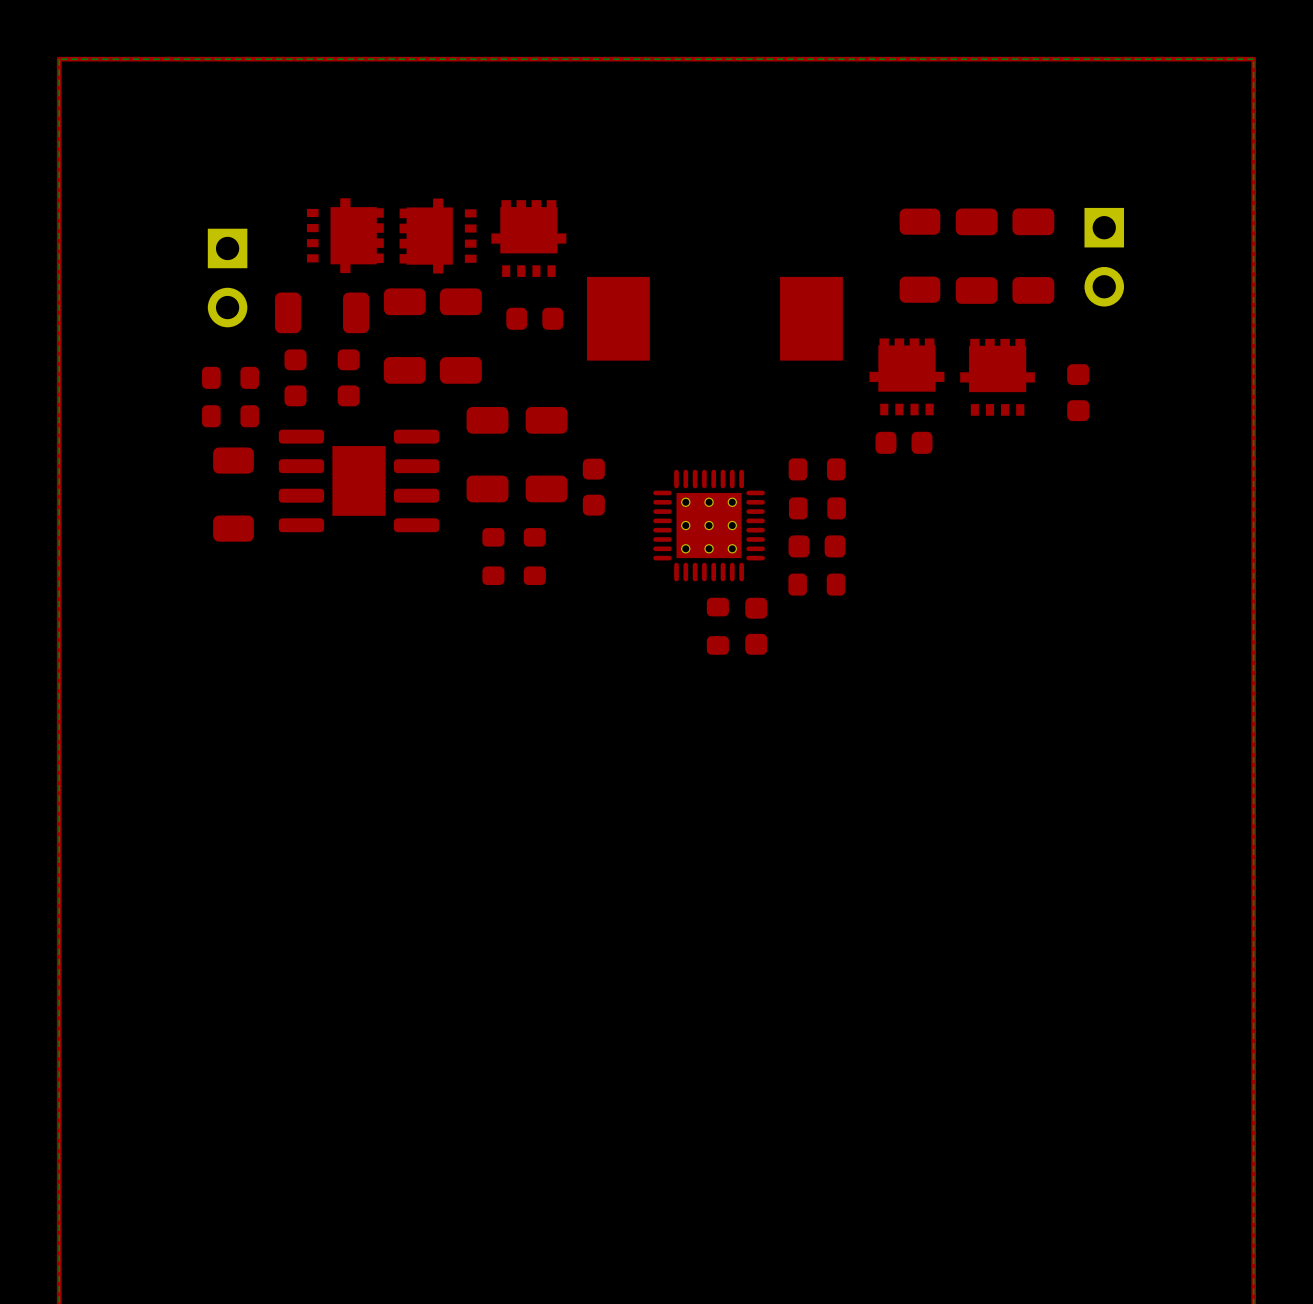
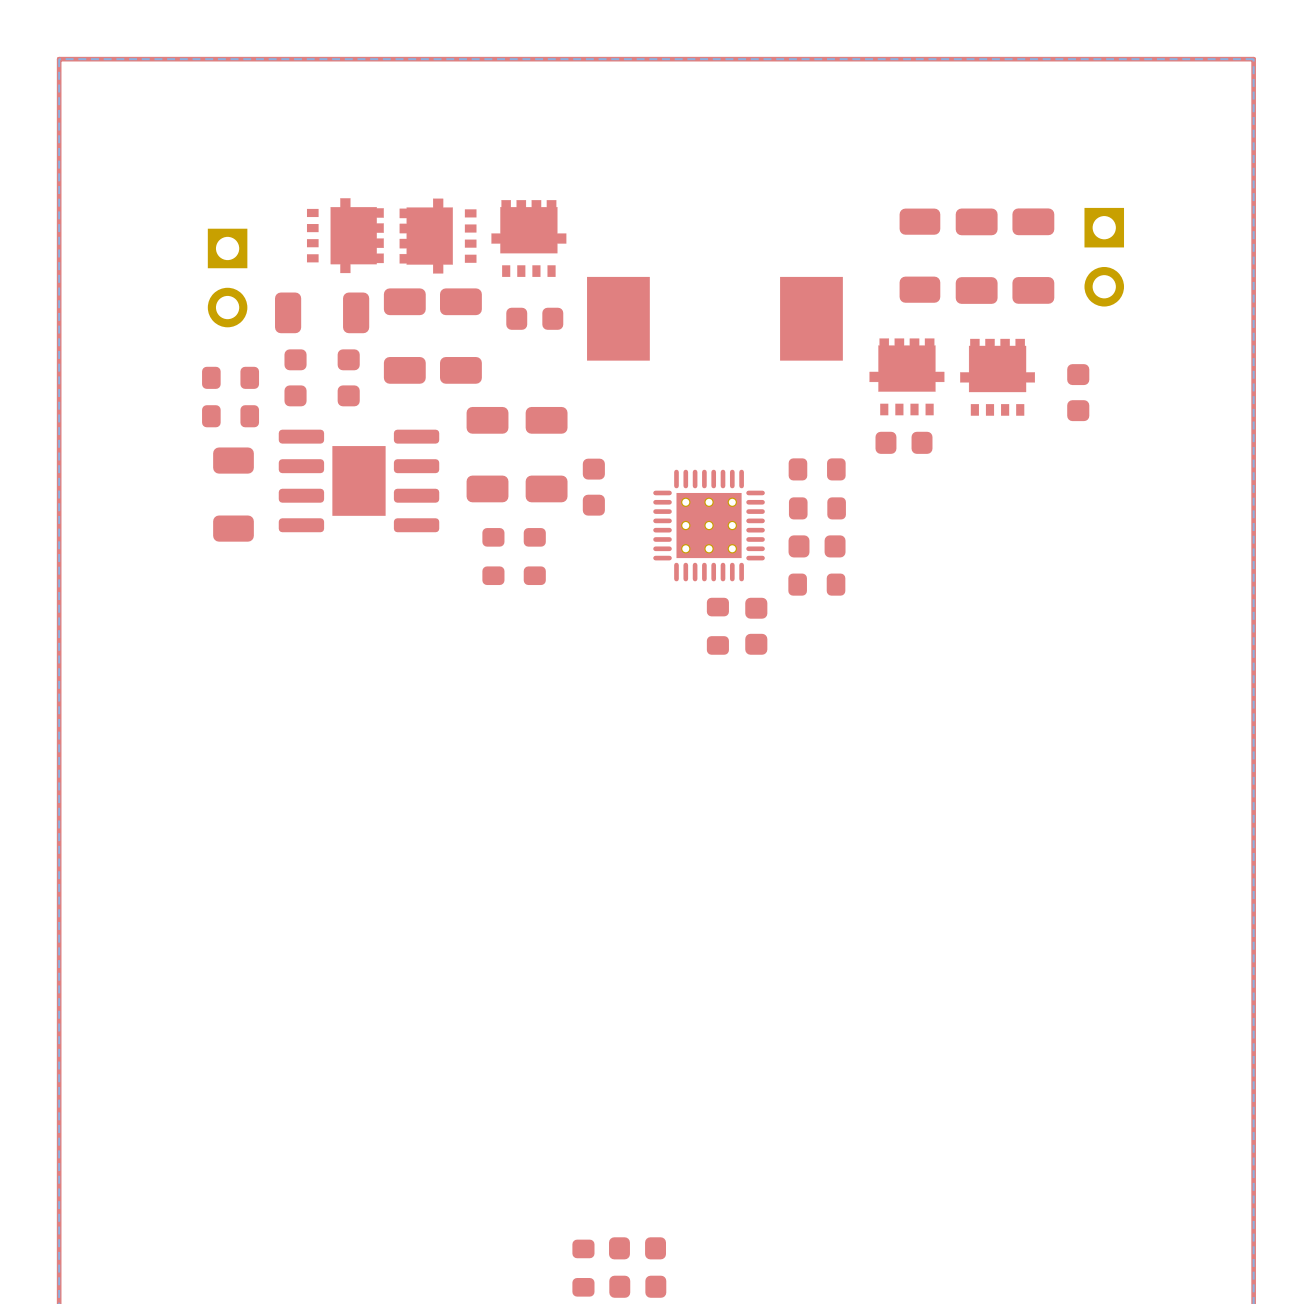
part: none -> (637, 1248)
part: none -> (583, 1268)
part: none -> (637, 1286)

